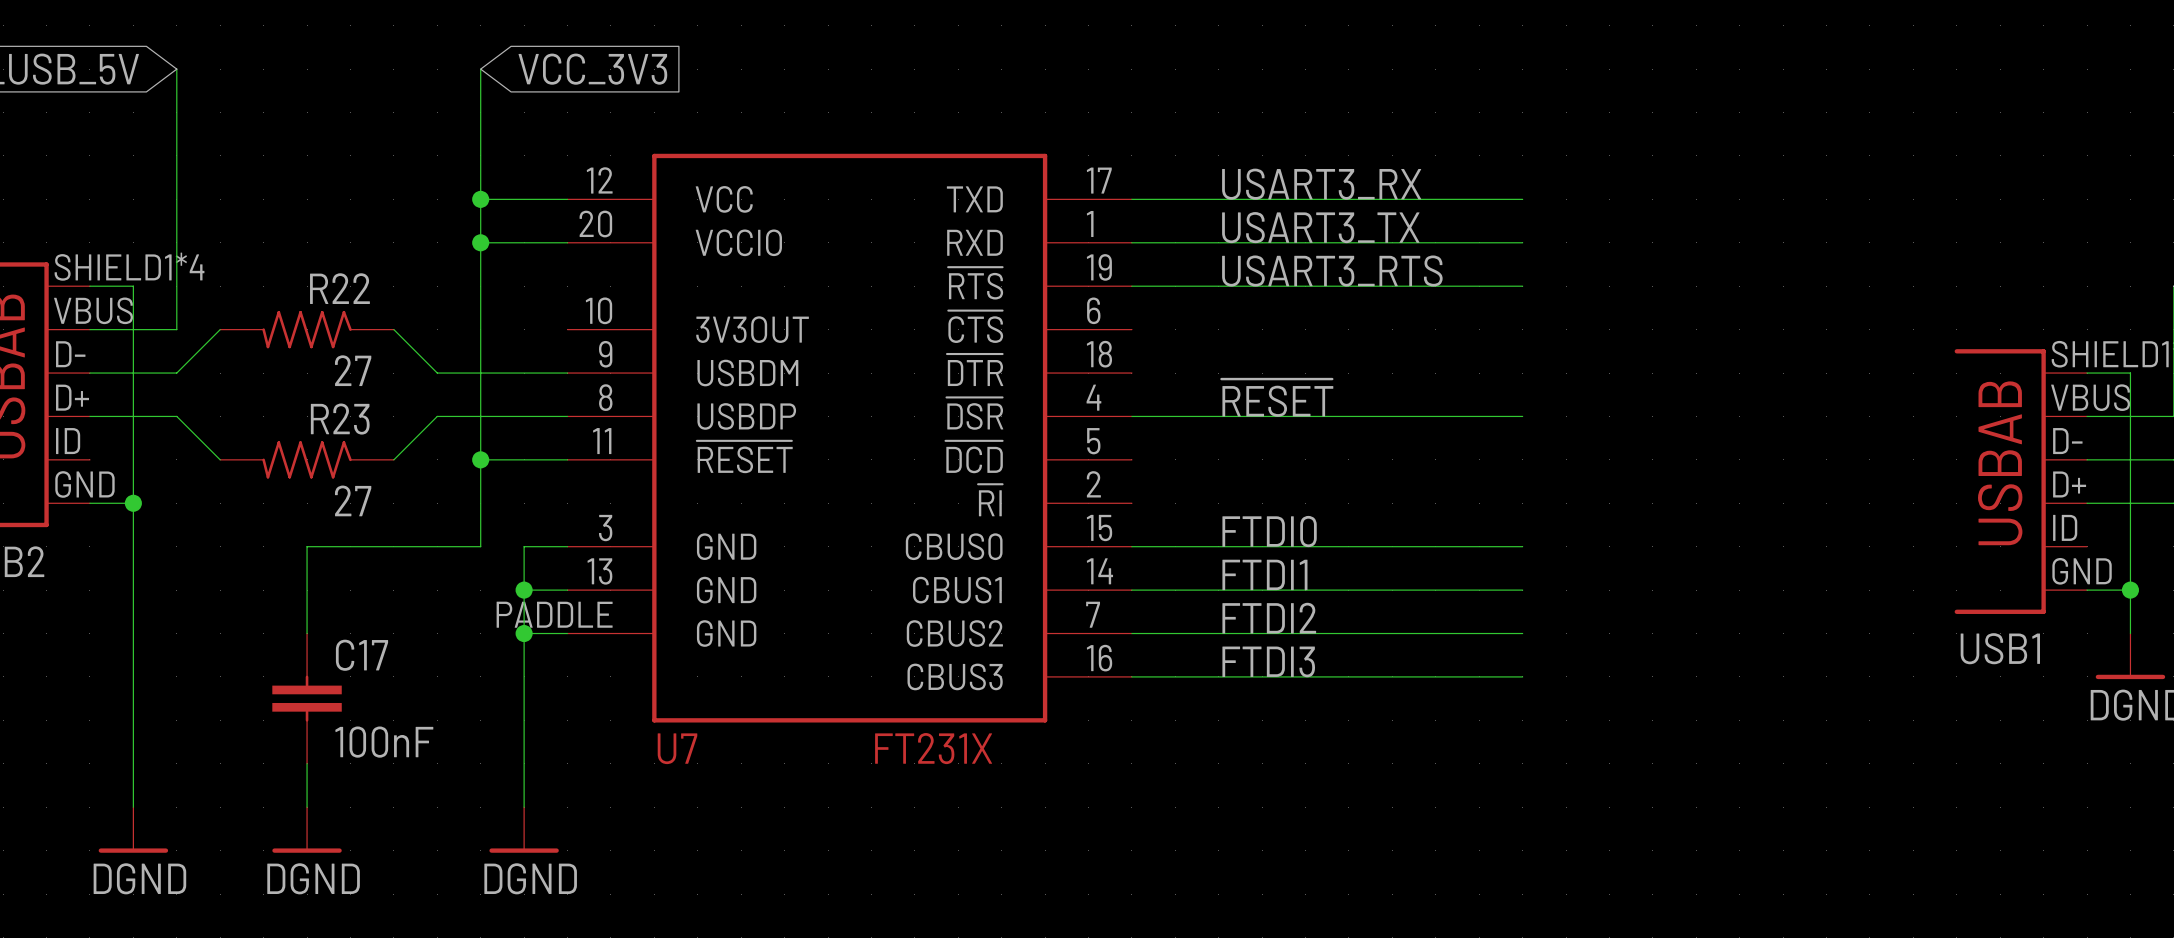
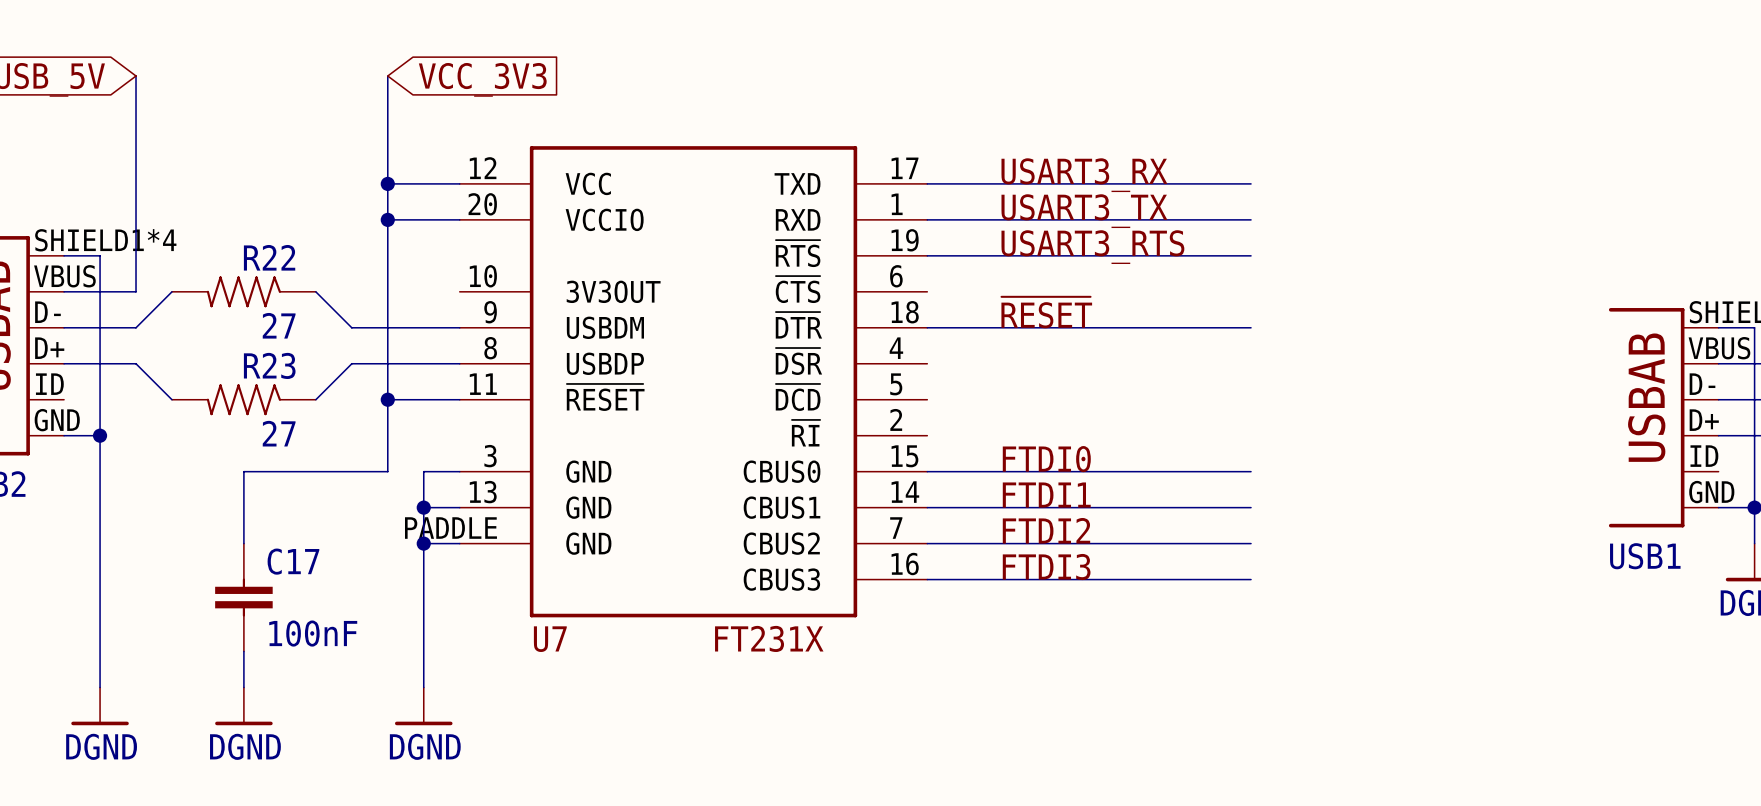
label position: ~{RESET} (1277, 397) -> ~{RESET} (1046, 312)
wire: (1131, 416) (1522, 416) -> (927, 327) (1251, 327)

